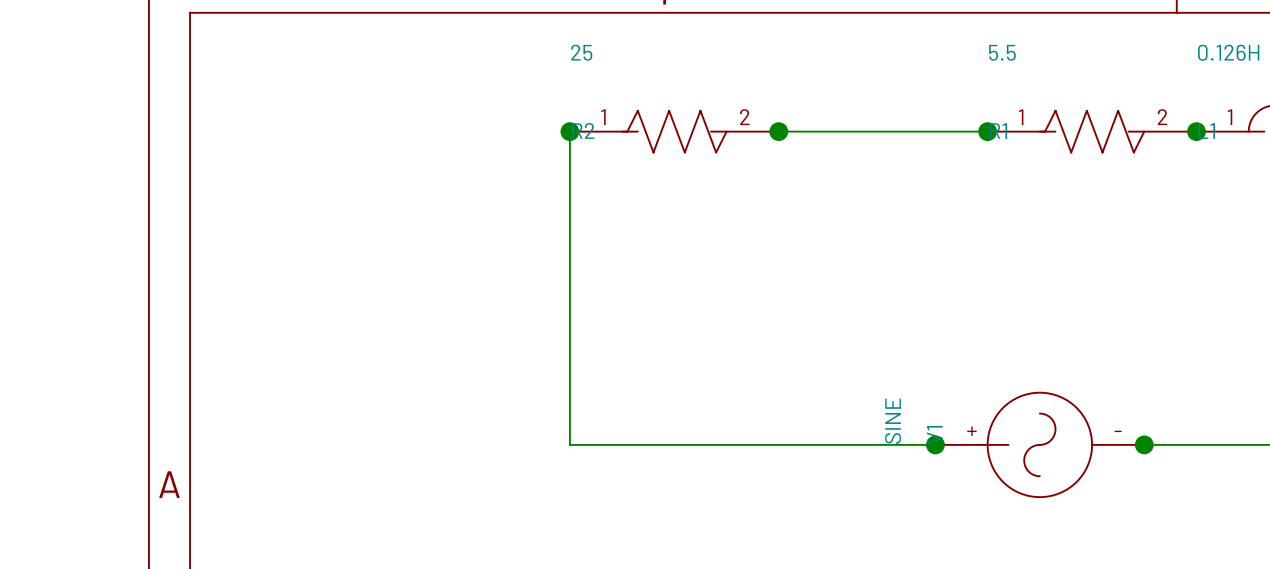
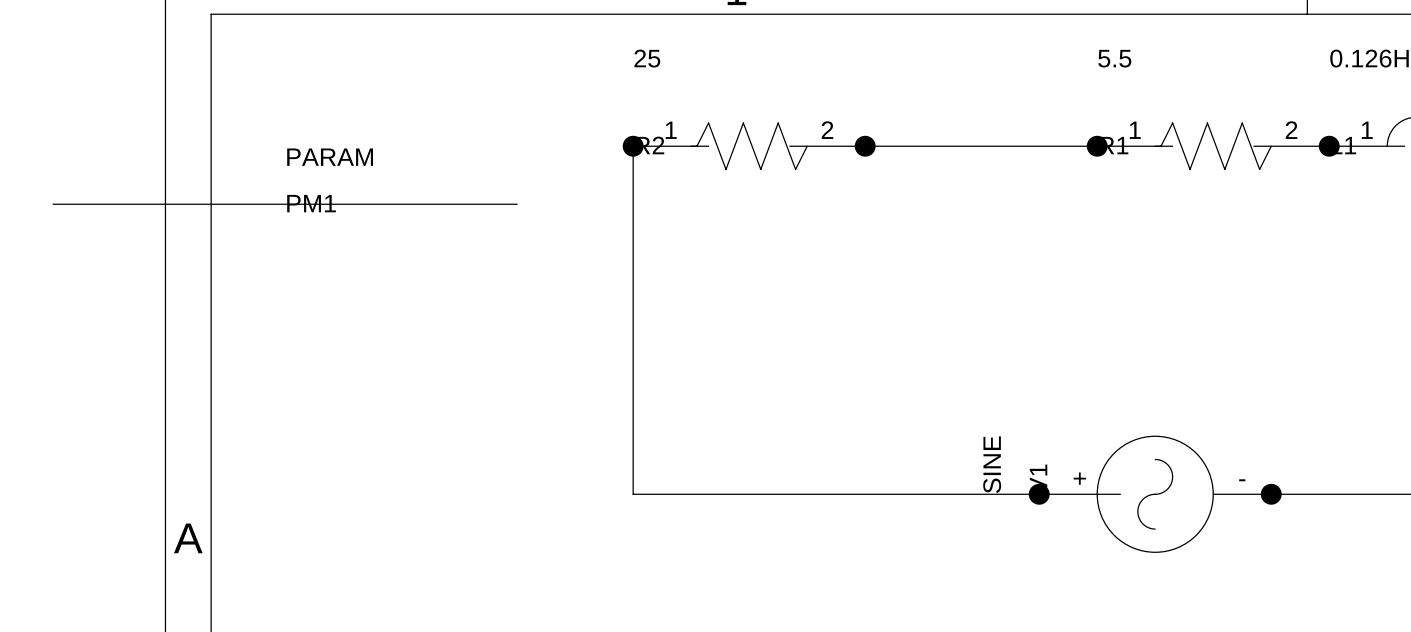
PM1: none -> PARAM (285, 204)

